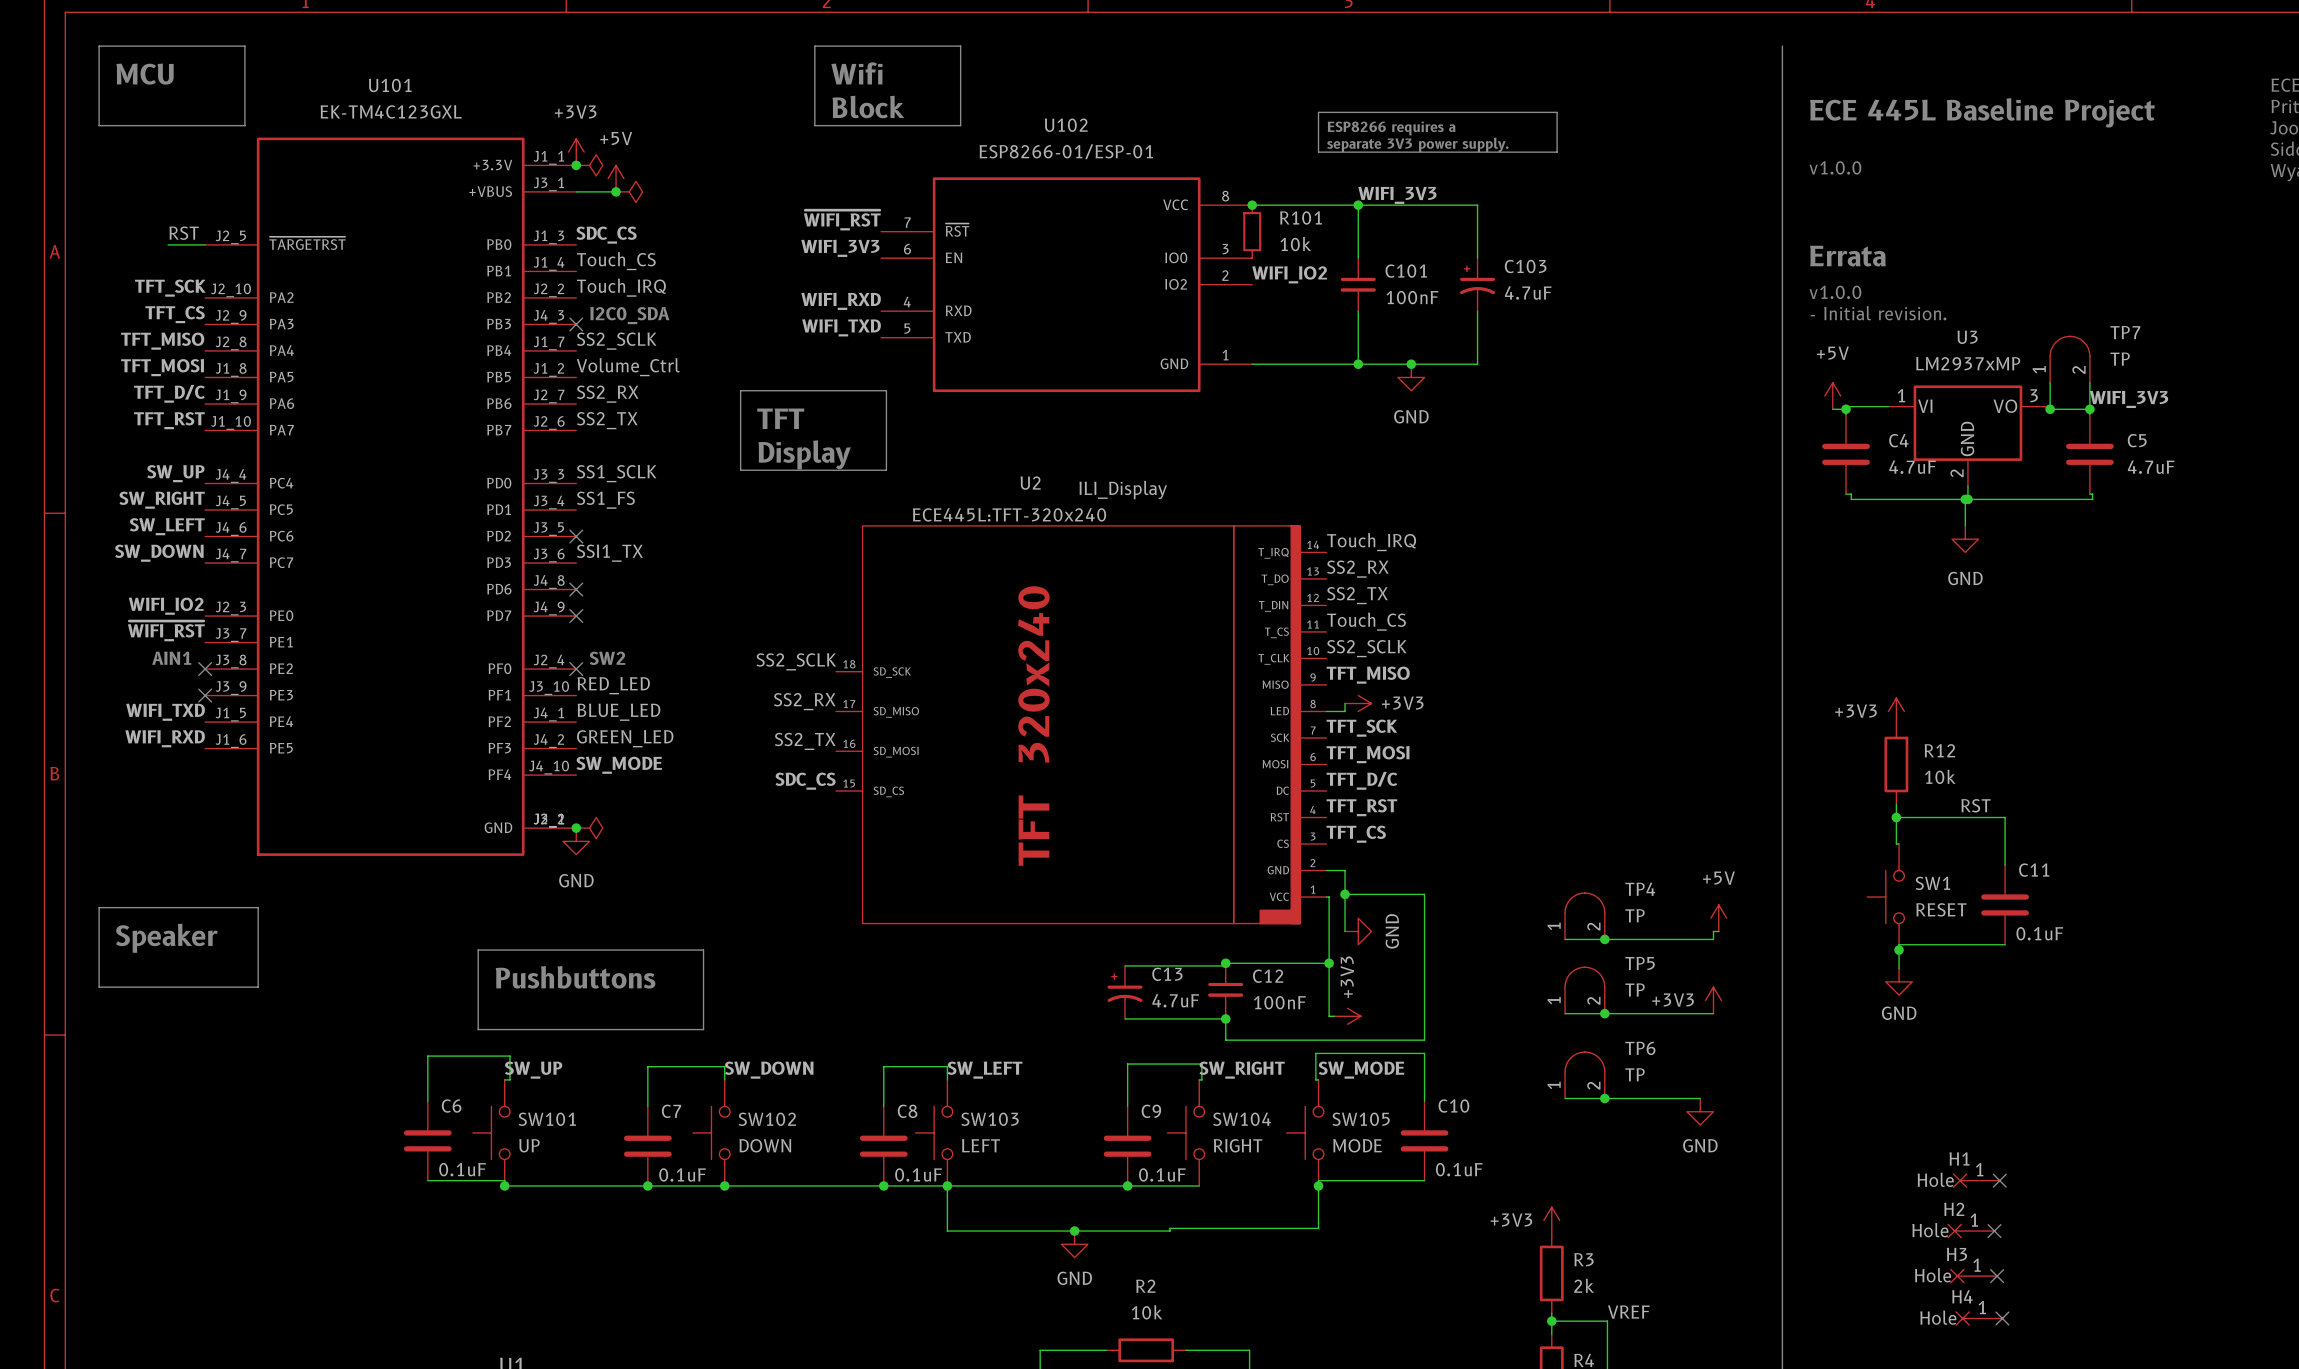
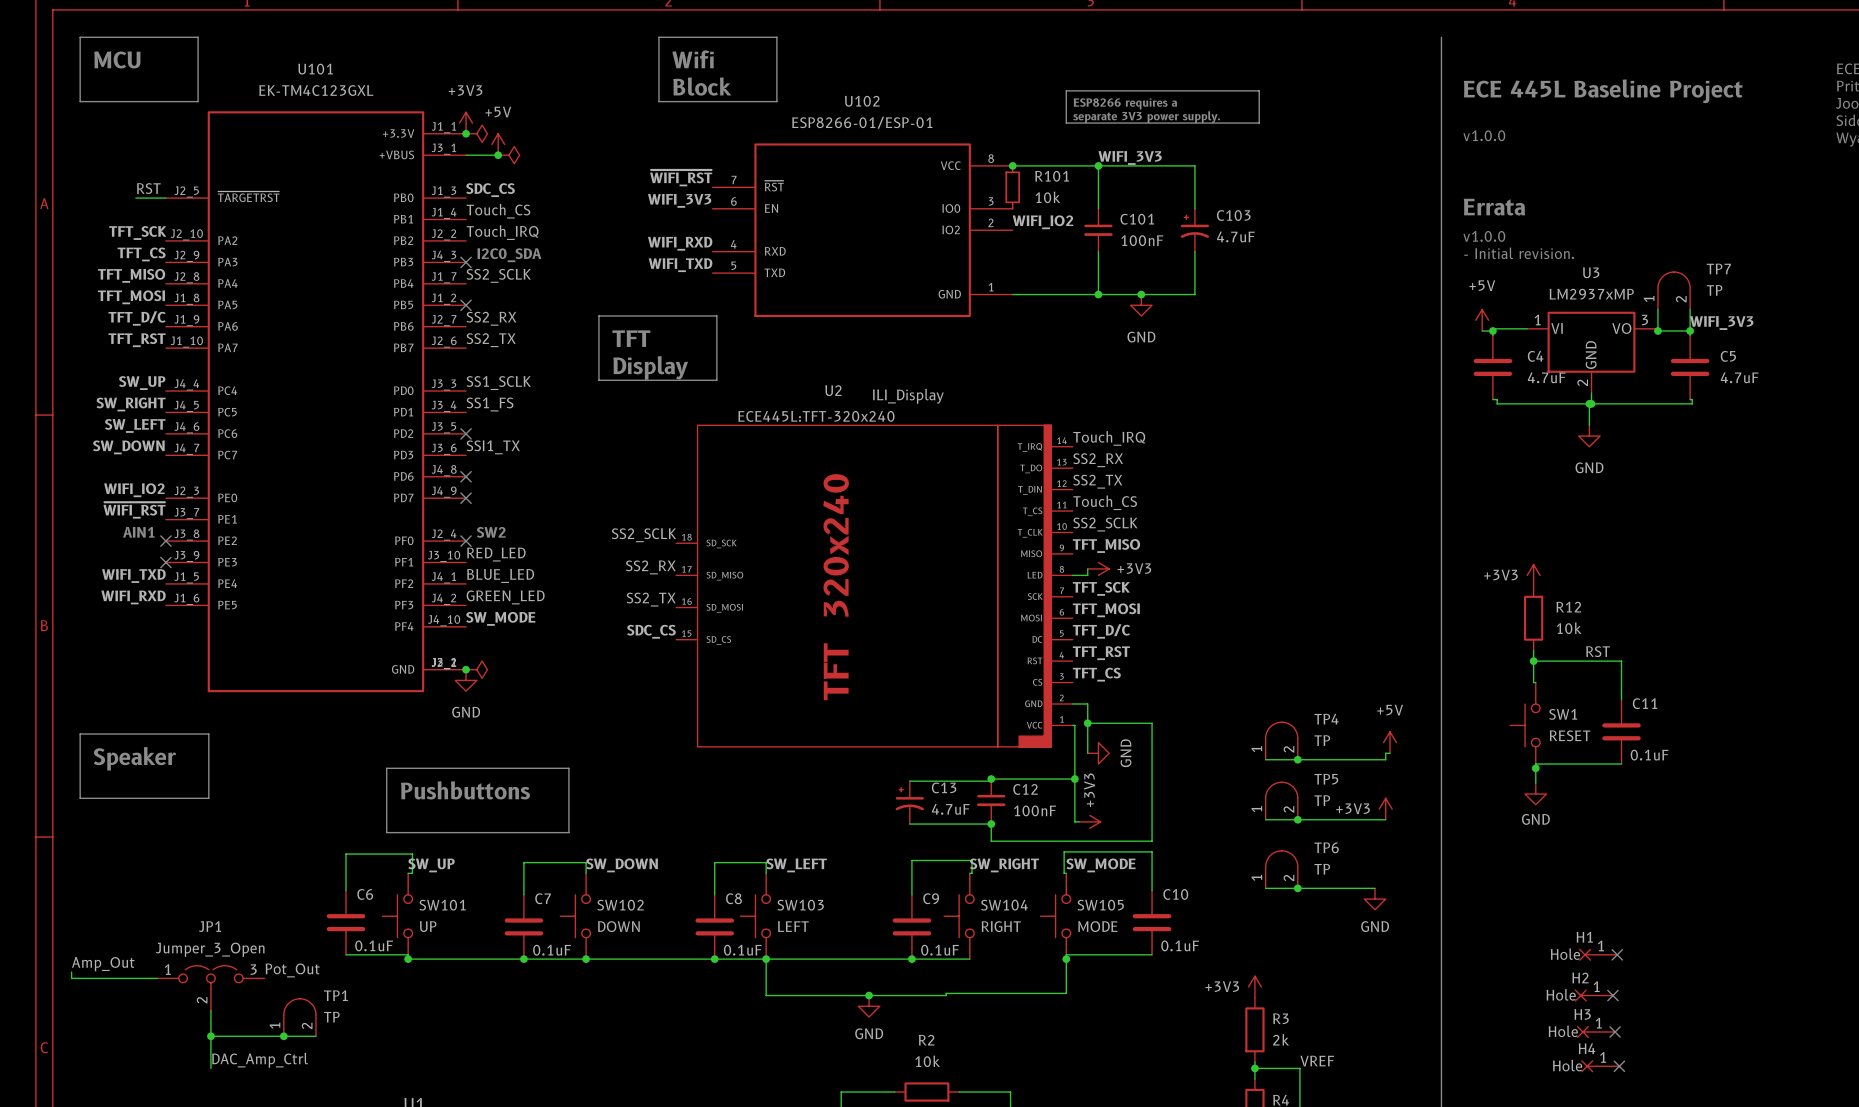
label: Volume_Ctrl (628, 367) -> none
no-connect mark: none -> (466, 305)
label: none -> Amp_Out (103, 964)
label: none -> Pot_Out (292, 970)
wire: none -> (71, 971) (71, 978) (157, 978)
JP1: none -> Jumper_3_Open (210, 988)
wire: none -> (210, 1010) (210, 1068)
TP1: none -> TP (299, 1017)
wire: none -> (210, 1036) (315, 1036)
junction: none -> (210, 1036)
junction: none -> (283, 1036)
label: none -> DAC_Amp_Ctrl (260, 1060)

